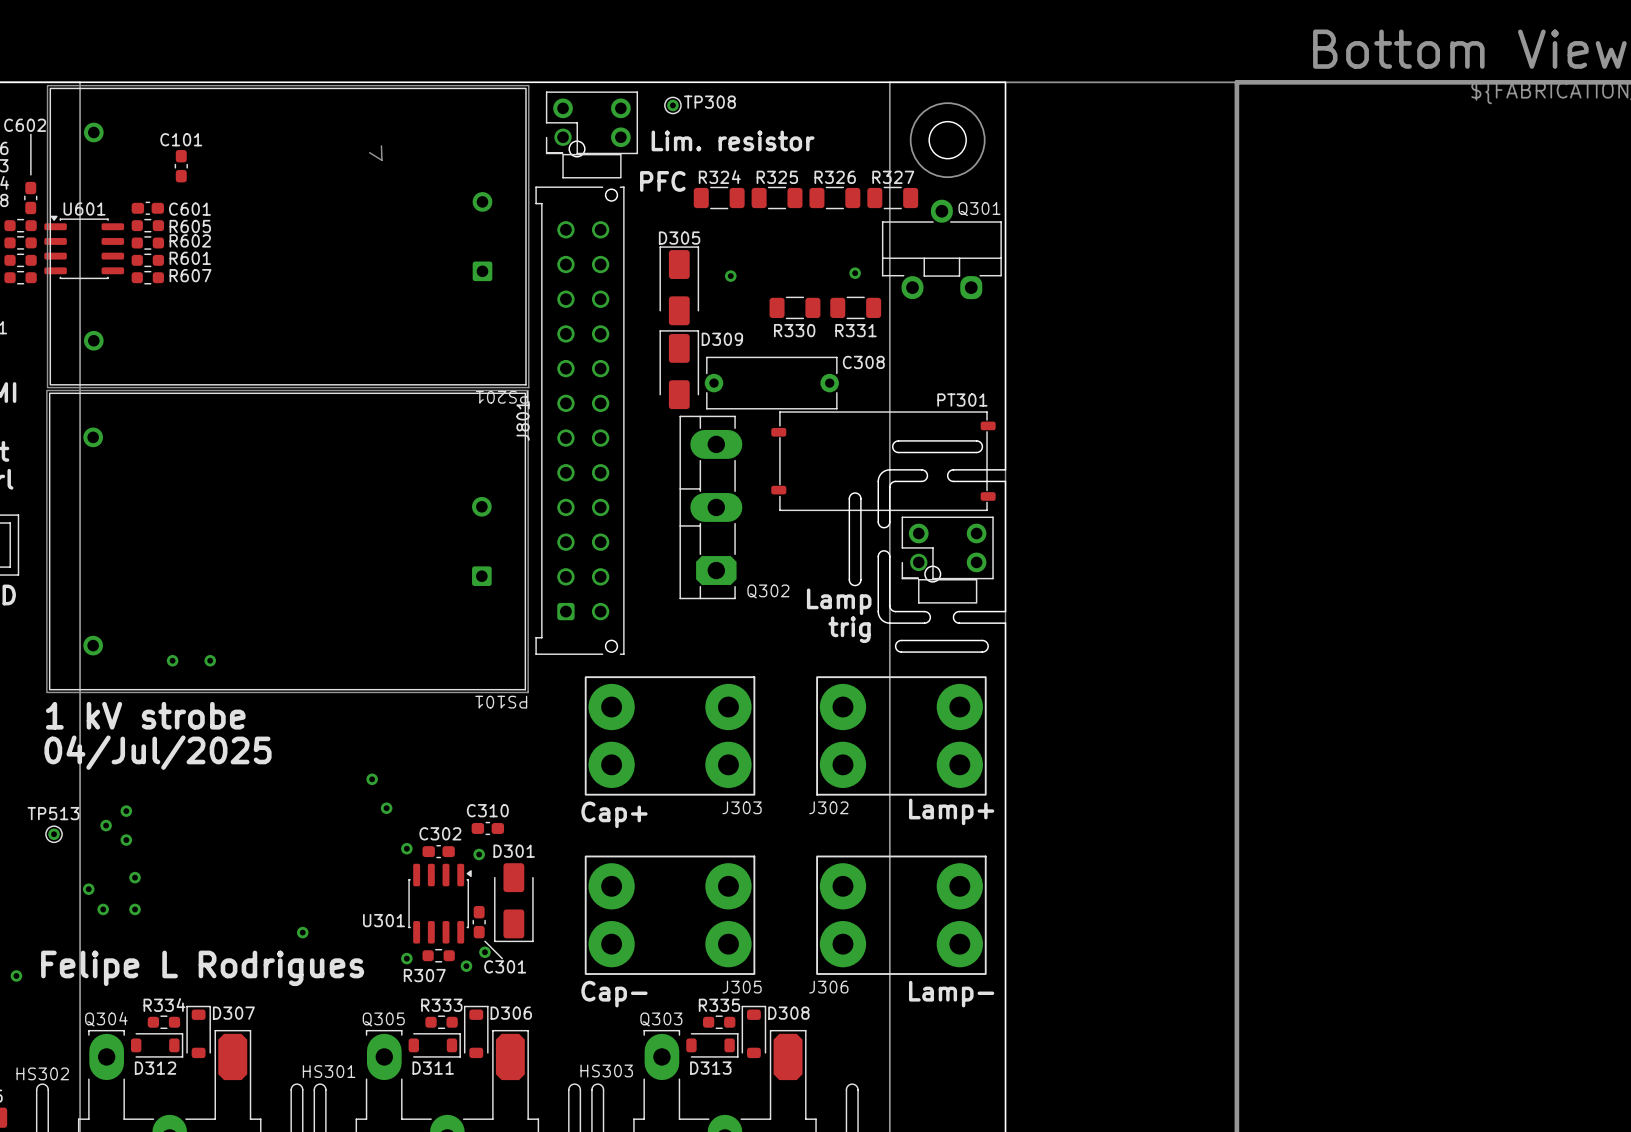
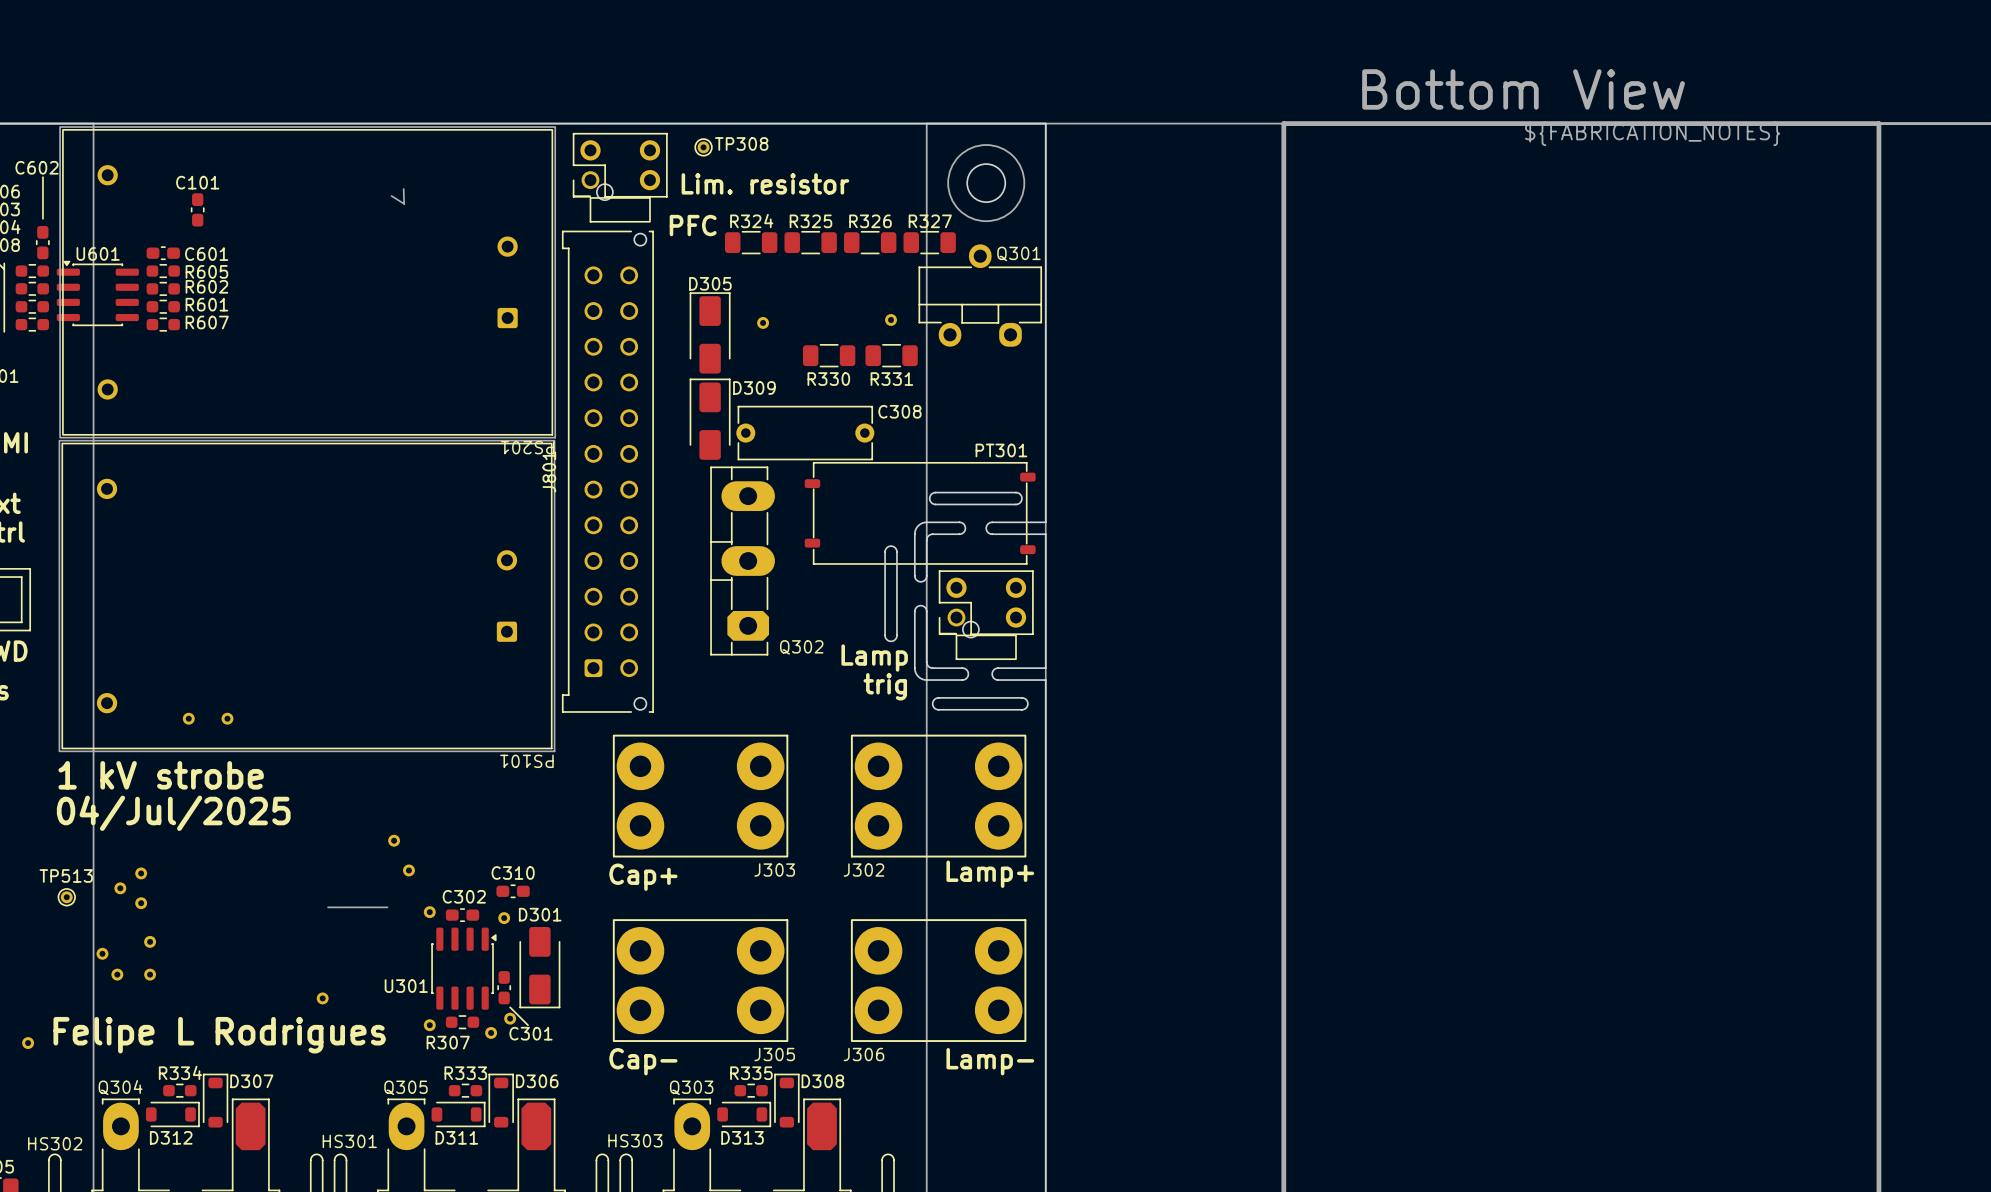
line: none -> (328, 907) (387, 907)

